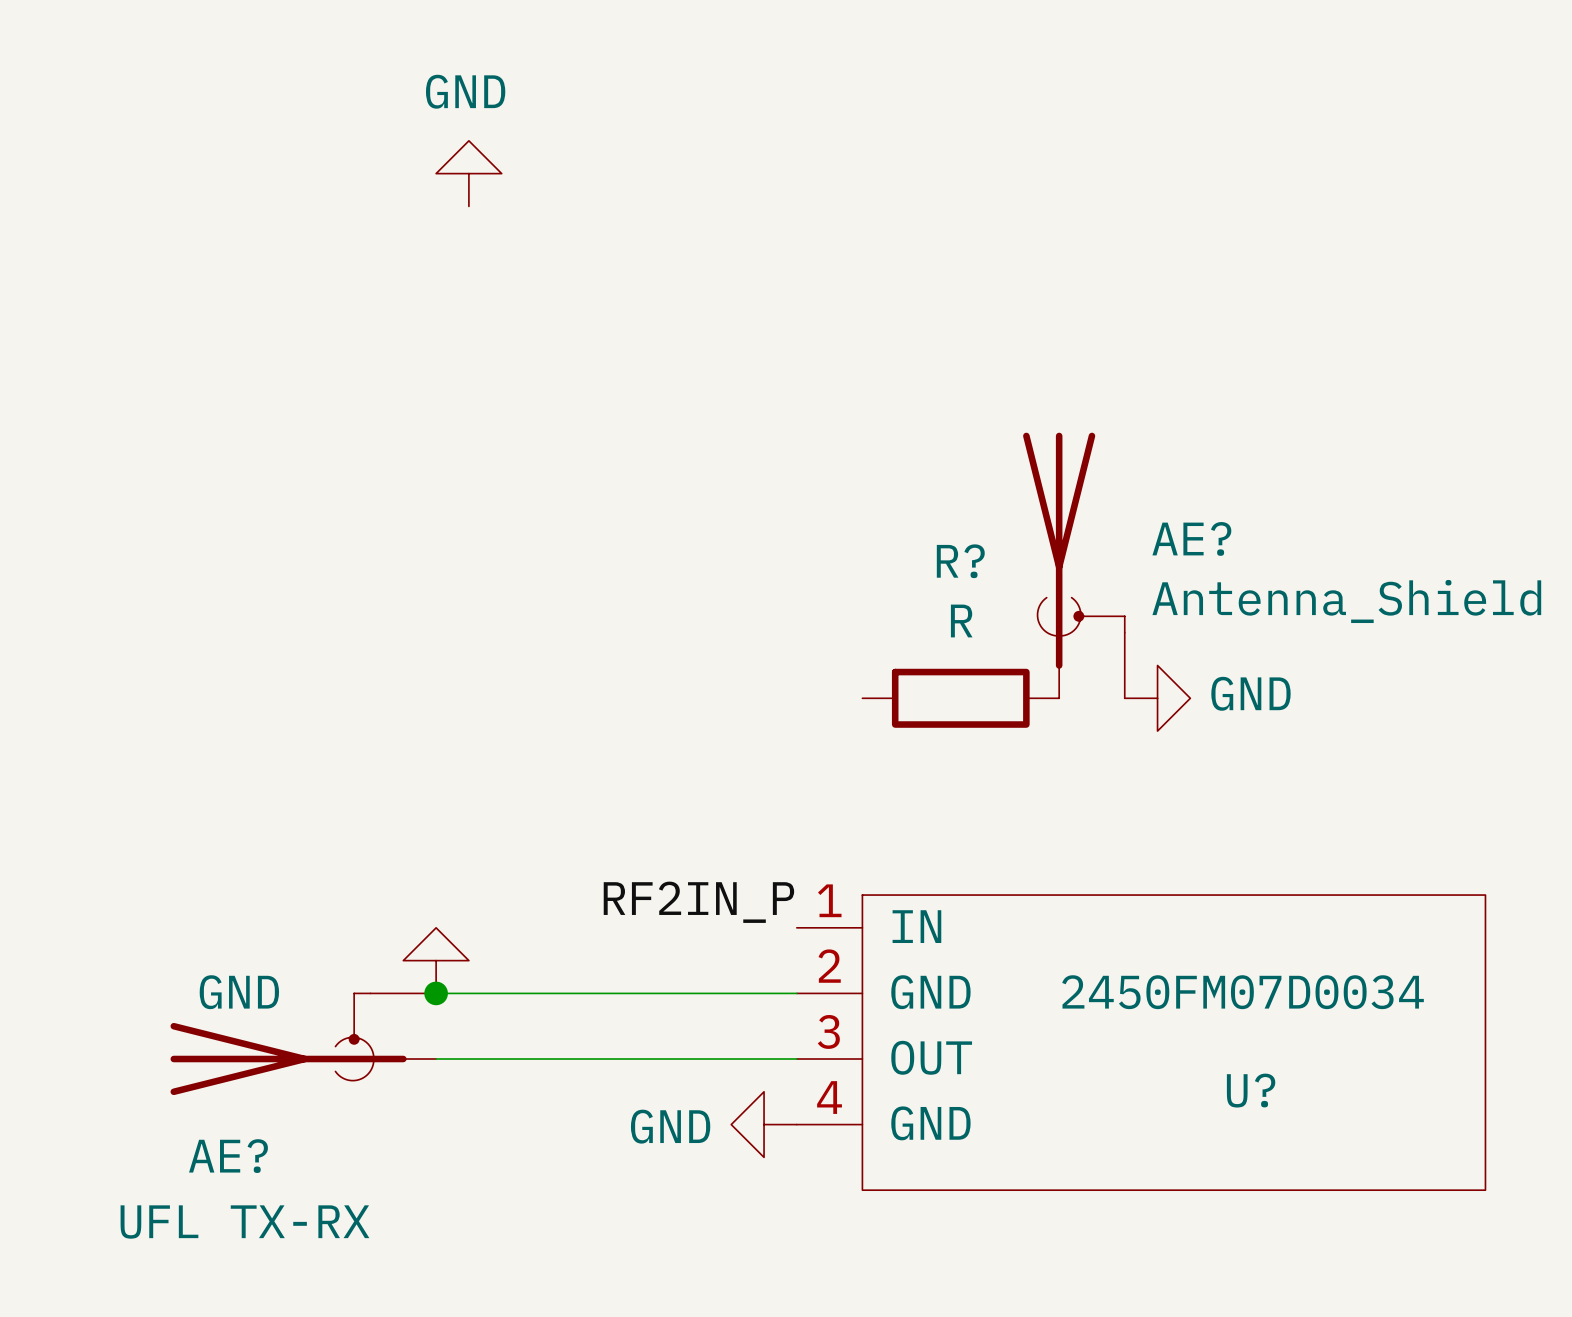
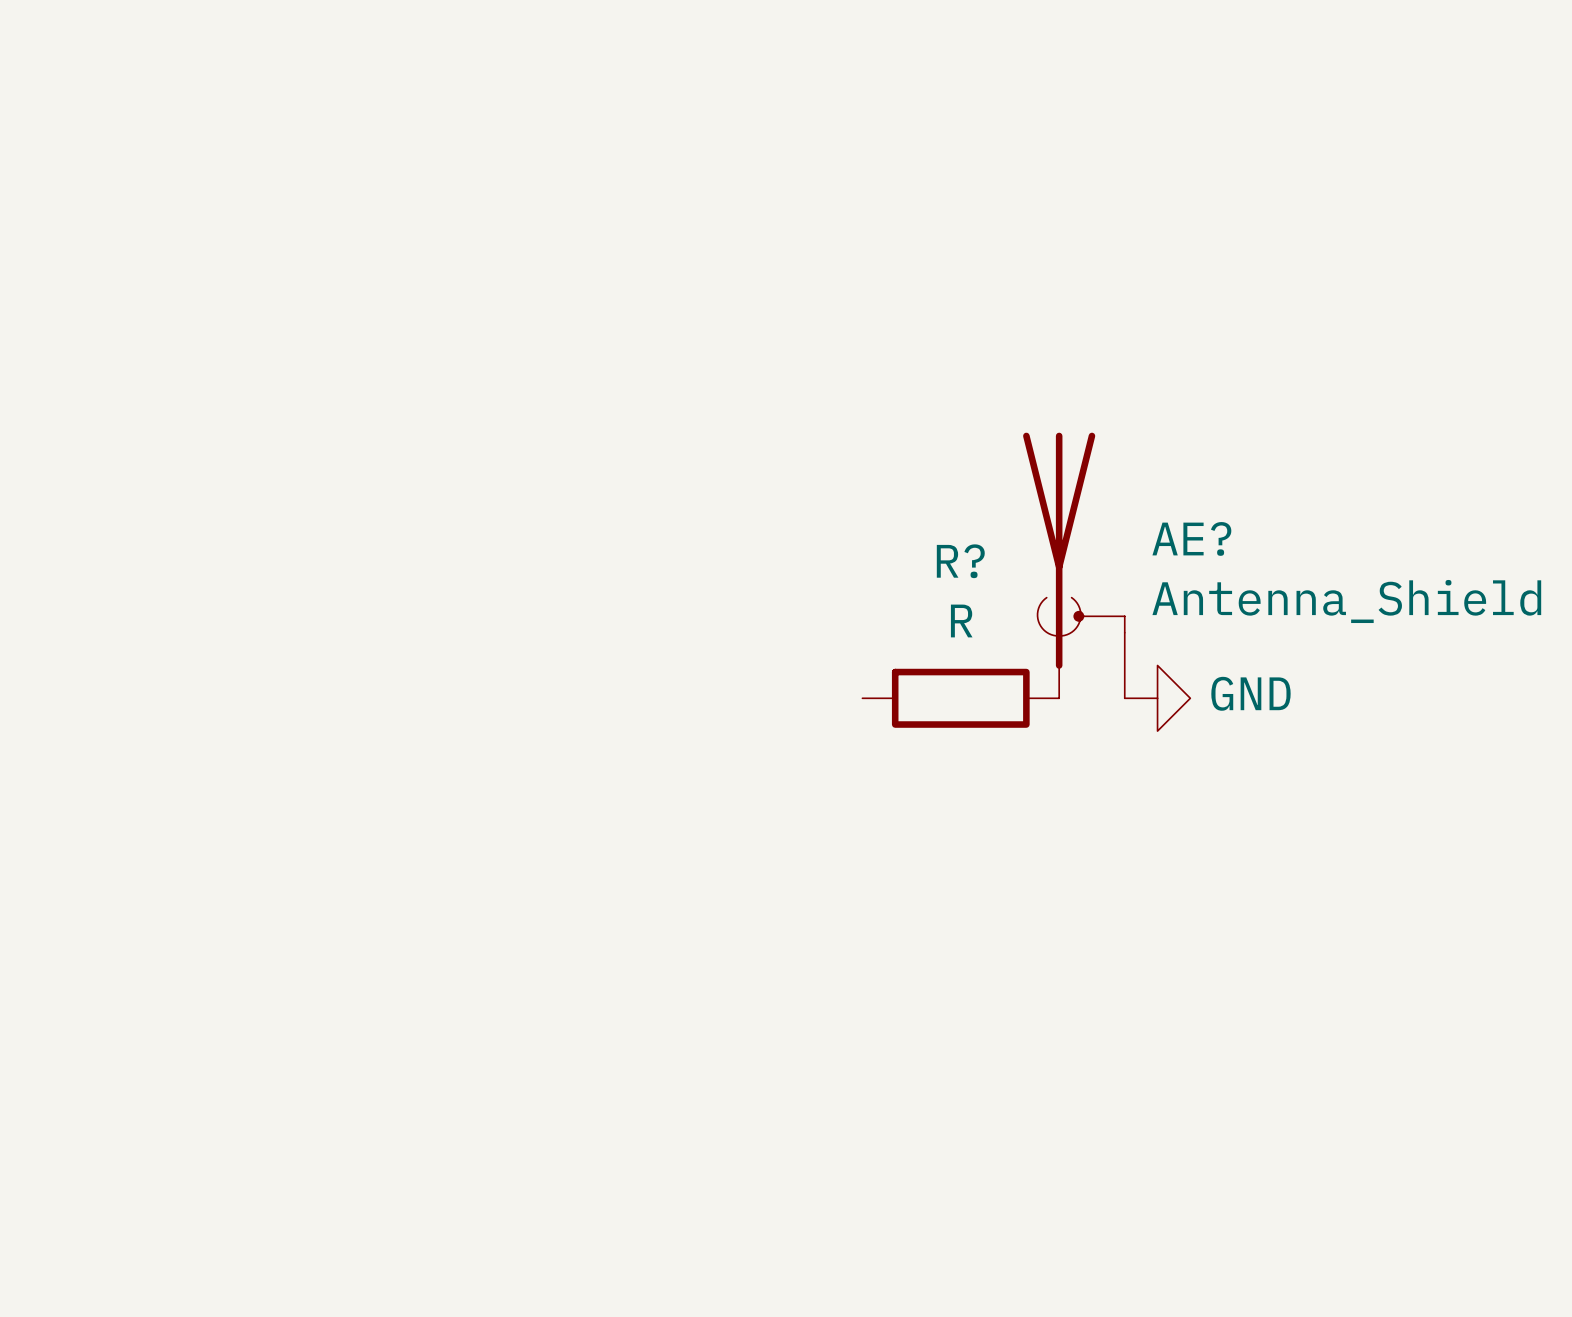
power symbol: GND (468, 173) -> none
label: RF2IN_P (698, 902) -> none
power symbol: GND (436, 960) -> none
wire: (436, 993) (796, 993) -> none
junction: (436, 993) -> none
U?: 2450FM07D0034 (1141, 1042) -> none
AE?: UFL TX-RX (303, 1044) -> none
wire: (436, 1059) (796, 1059) -> none
power symbol: GND (764, 1124) -> none

